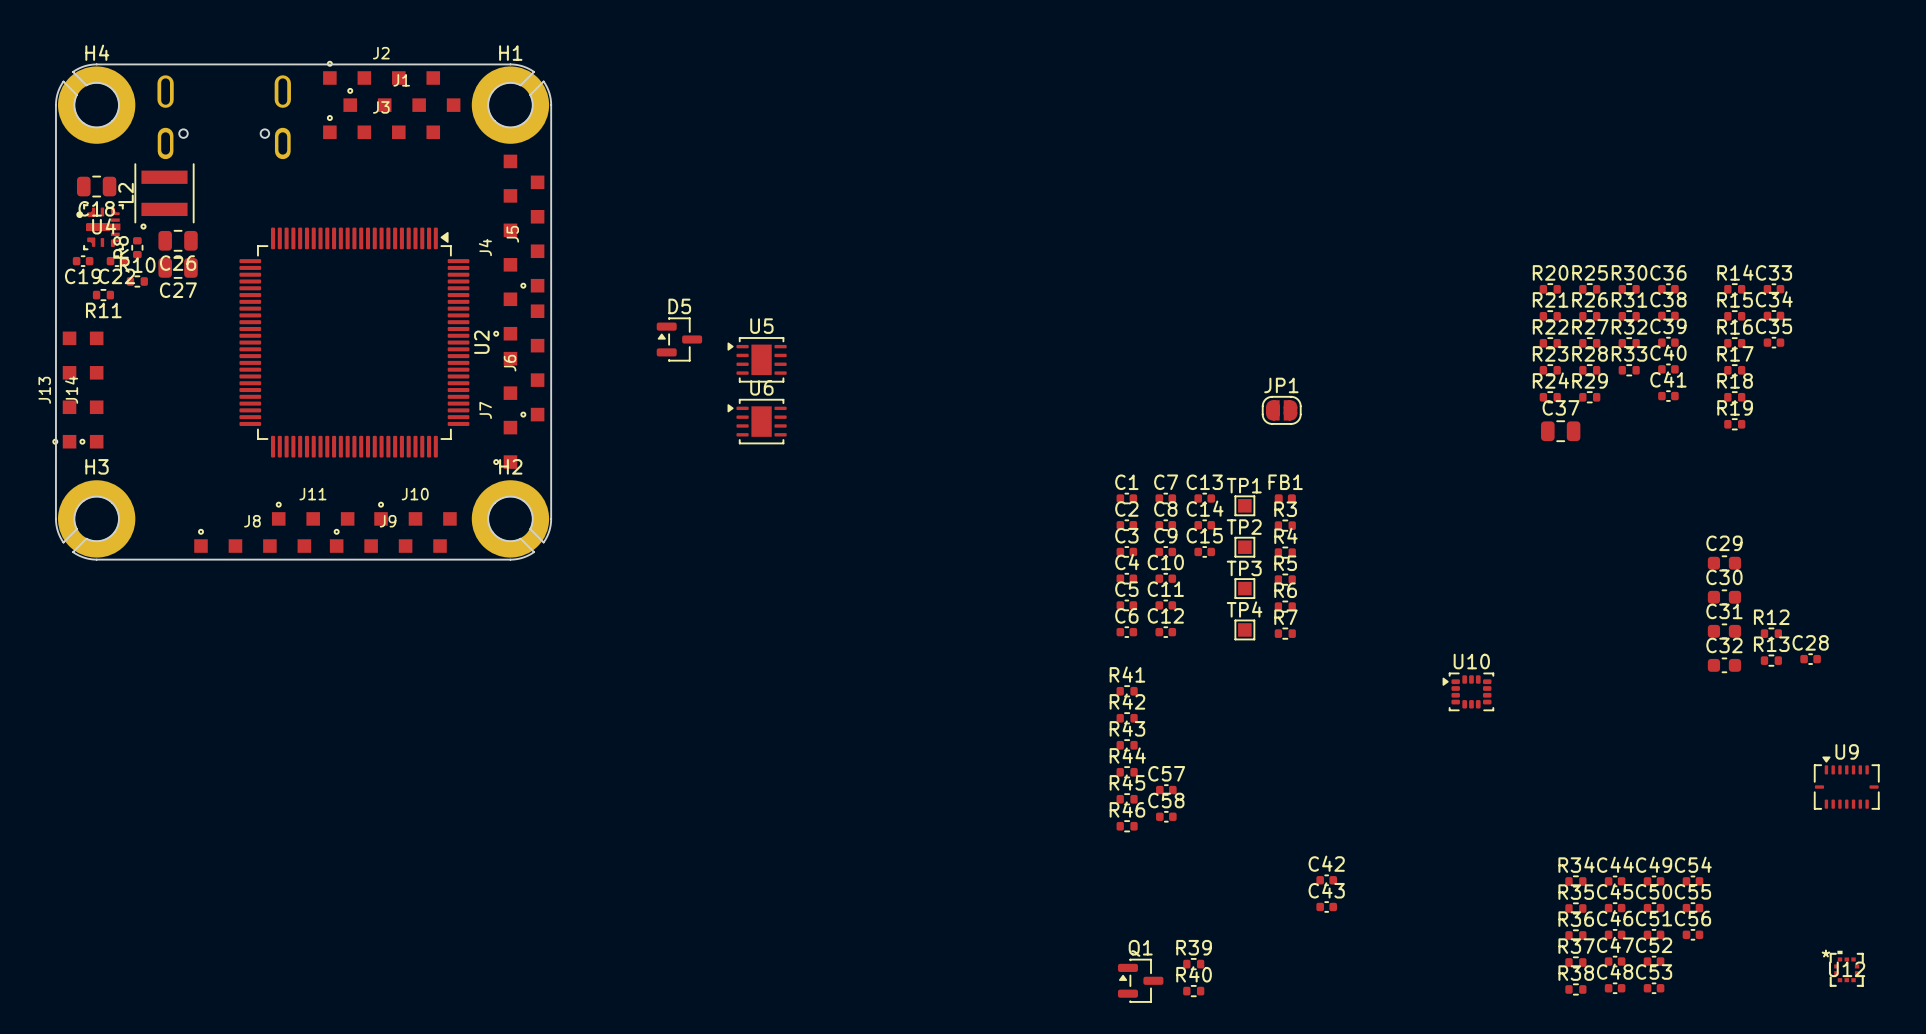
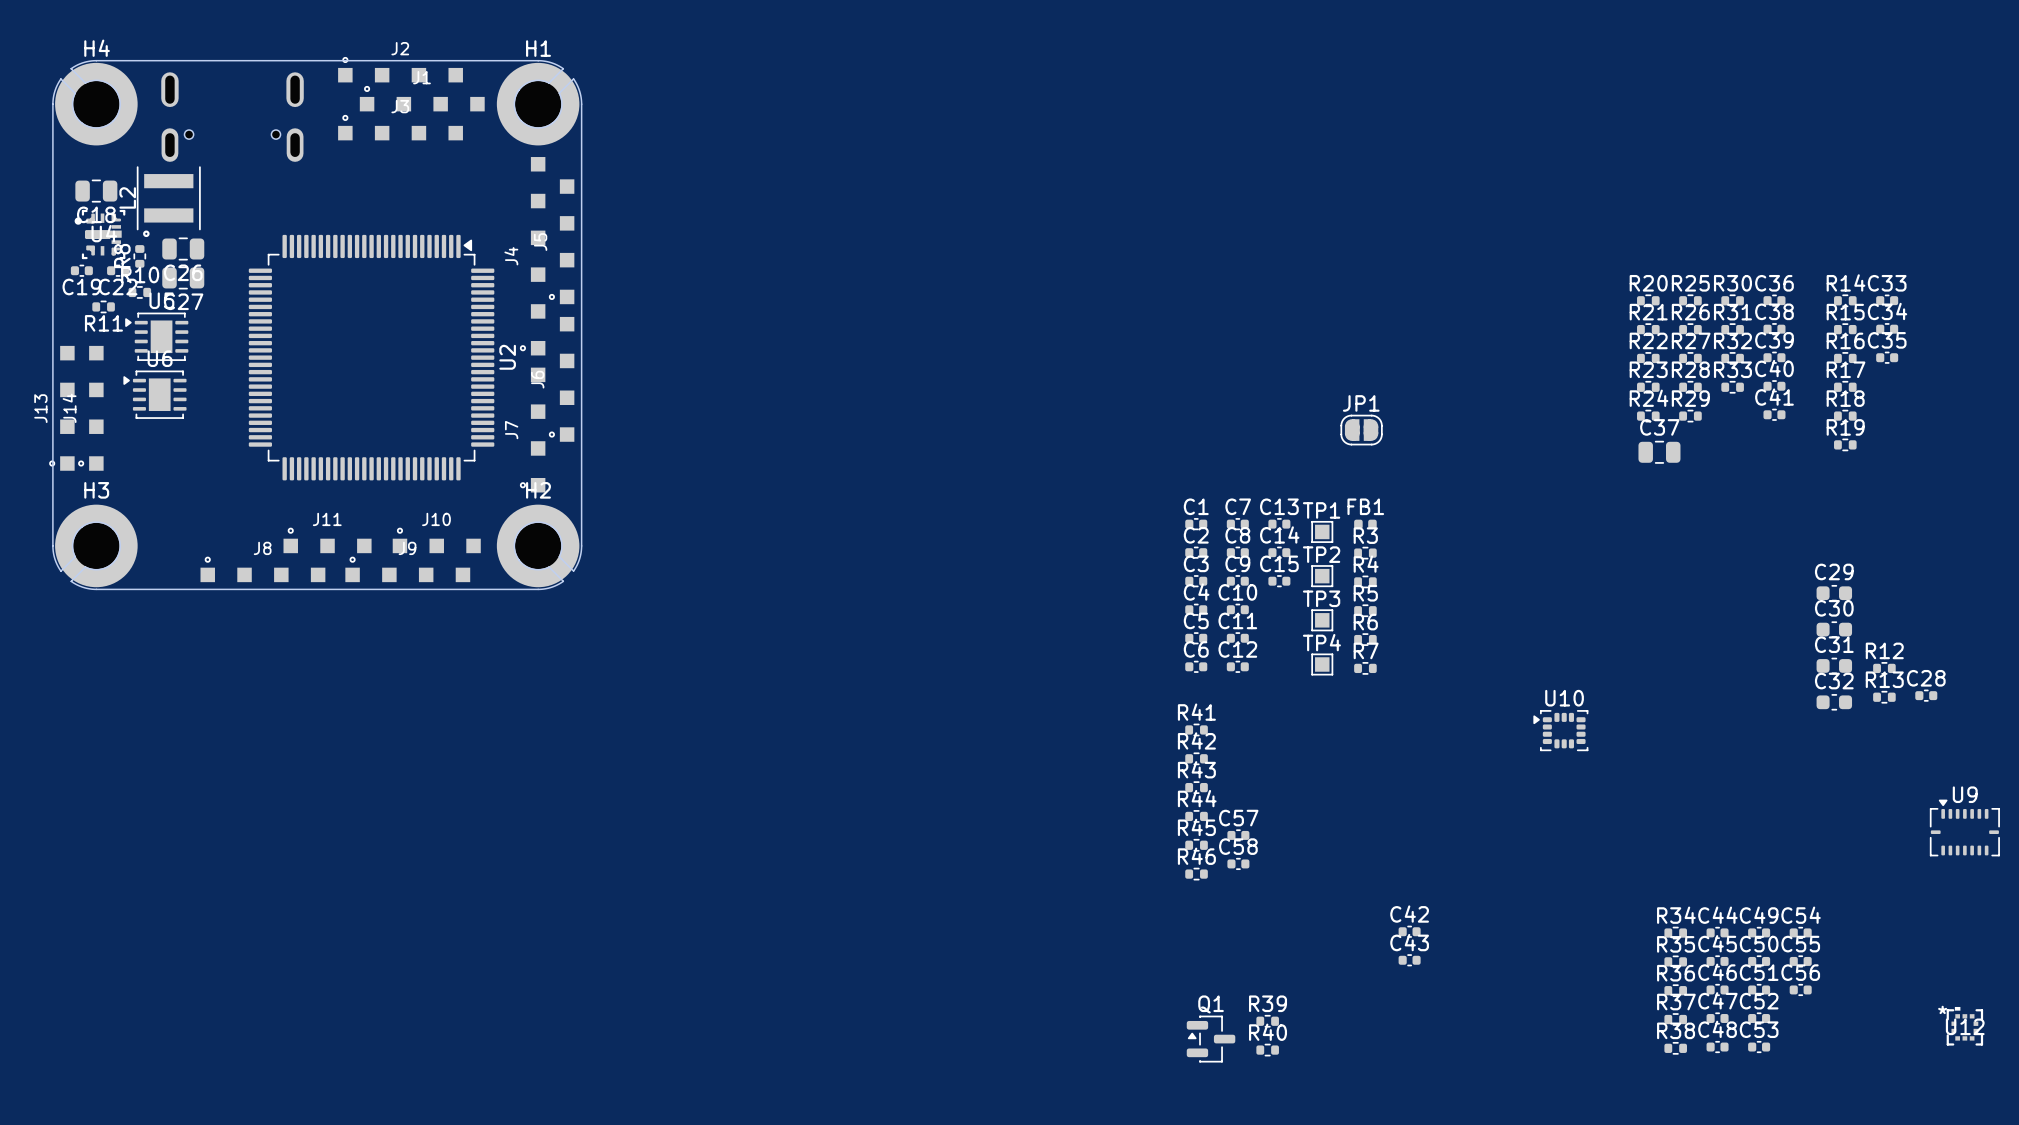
D5: (679, 339) -> none
U5 position: (757, 359) -> (156, 336)
U6 position: (757, 421) -> (154, 394)

